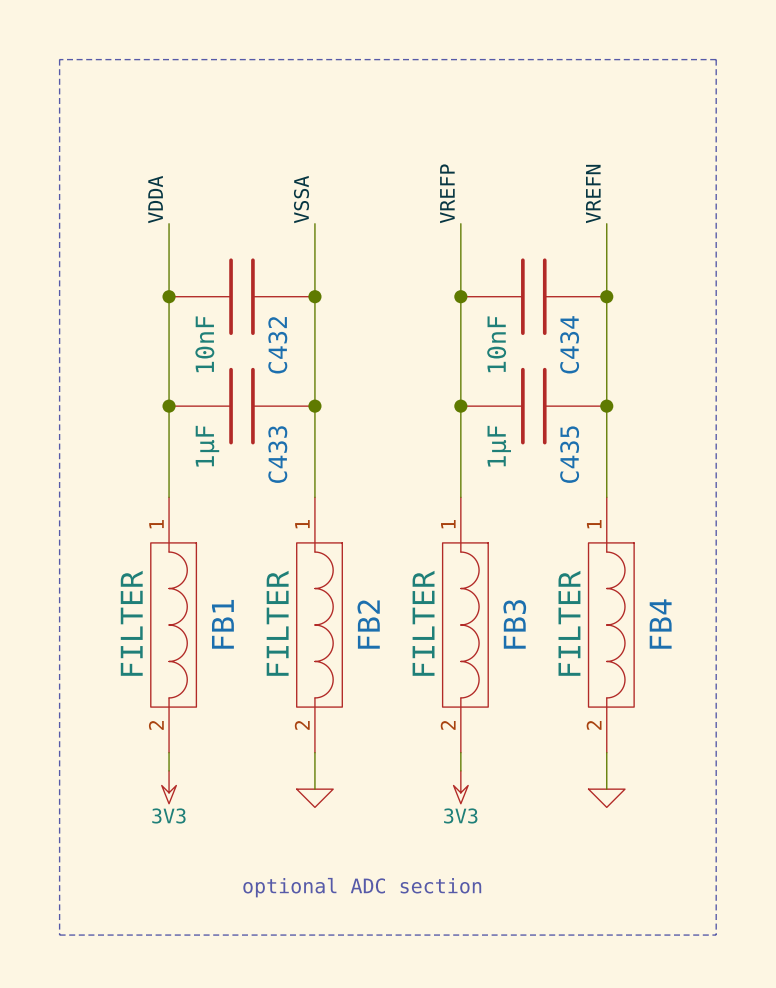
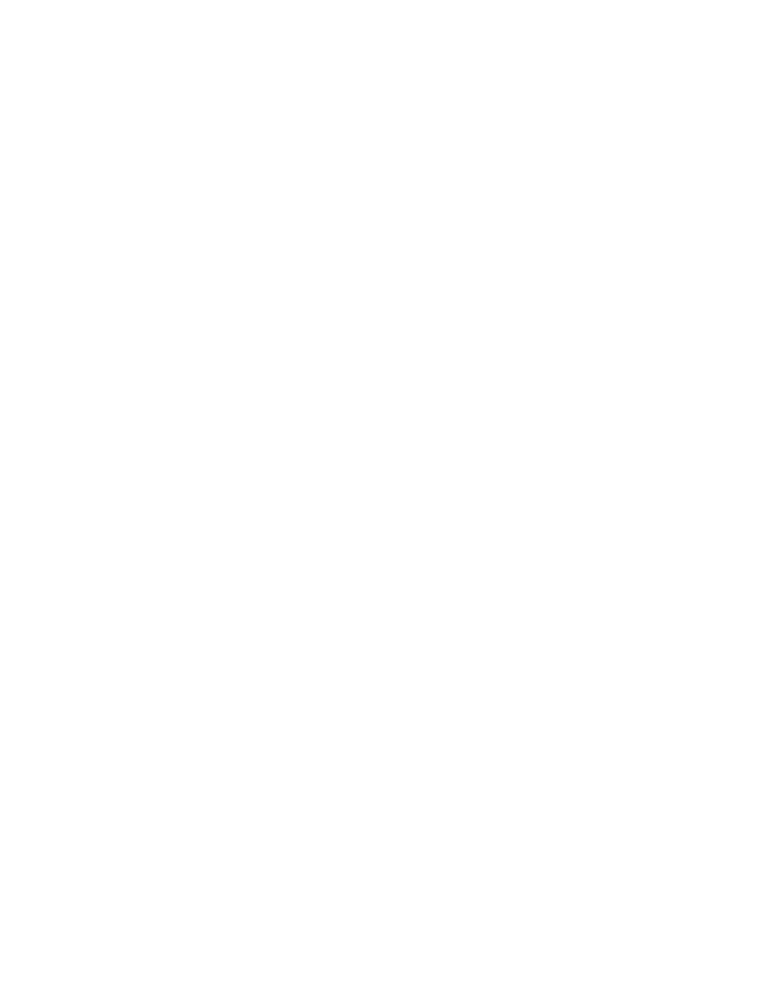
line: (59, 59) (716, 59) (716, 935) (59, 935) (59, 59) -> none
label: VREFP (447, 193) -> none
label: VREFN (593, 194) -> none
label: VDDA (155, 199) -> none
label: VSSA (301, 199) -> none
wire: (169, 223) (169, 497) -> none
wire: (314, 223) (314, 497) -> none
wire: (460, 223) (460, 497) -> none
wire: (606, 223) (606, 497) -> none
junction: (169, 296) -> none
C432: 10nF (241, 296) -> none
junction: (314, 296) -> none
junction: (460, 296) -> none
C434: 10nF (533, 296) -> none
junction: (606, 296) -> none
junction: (169, 406) -> none
C433: 1µF (241, 406) -> none
junction: (314, 406) -> none
junction: (460, 406) -> none
C435: 1µF (533, 406) -> none
junction: (606, 406) -> none
FB1: FILTER (173, 625) -> none
FB2: FILTER (319, 625) -> none
FB3: FILTER (465, 625) -> none
FB4: FILTER (611, 625) -> none
wire: (169, 752) (169, 770) -> none
wire: (314, 752) (314, 789) -> none
wire: (460, 752) (460, 770) -> none
wire: (606, 752) (606, 789) -> none
power symbol: 3V3 (169, 787) -> none
power symbol: 3V3 (460, 787) -> none
power symbol: (314, 798) -> none
power symbol: (606, 798) -> none
text: optional ADC section (362, 887) -> none

